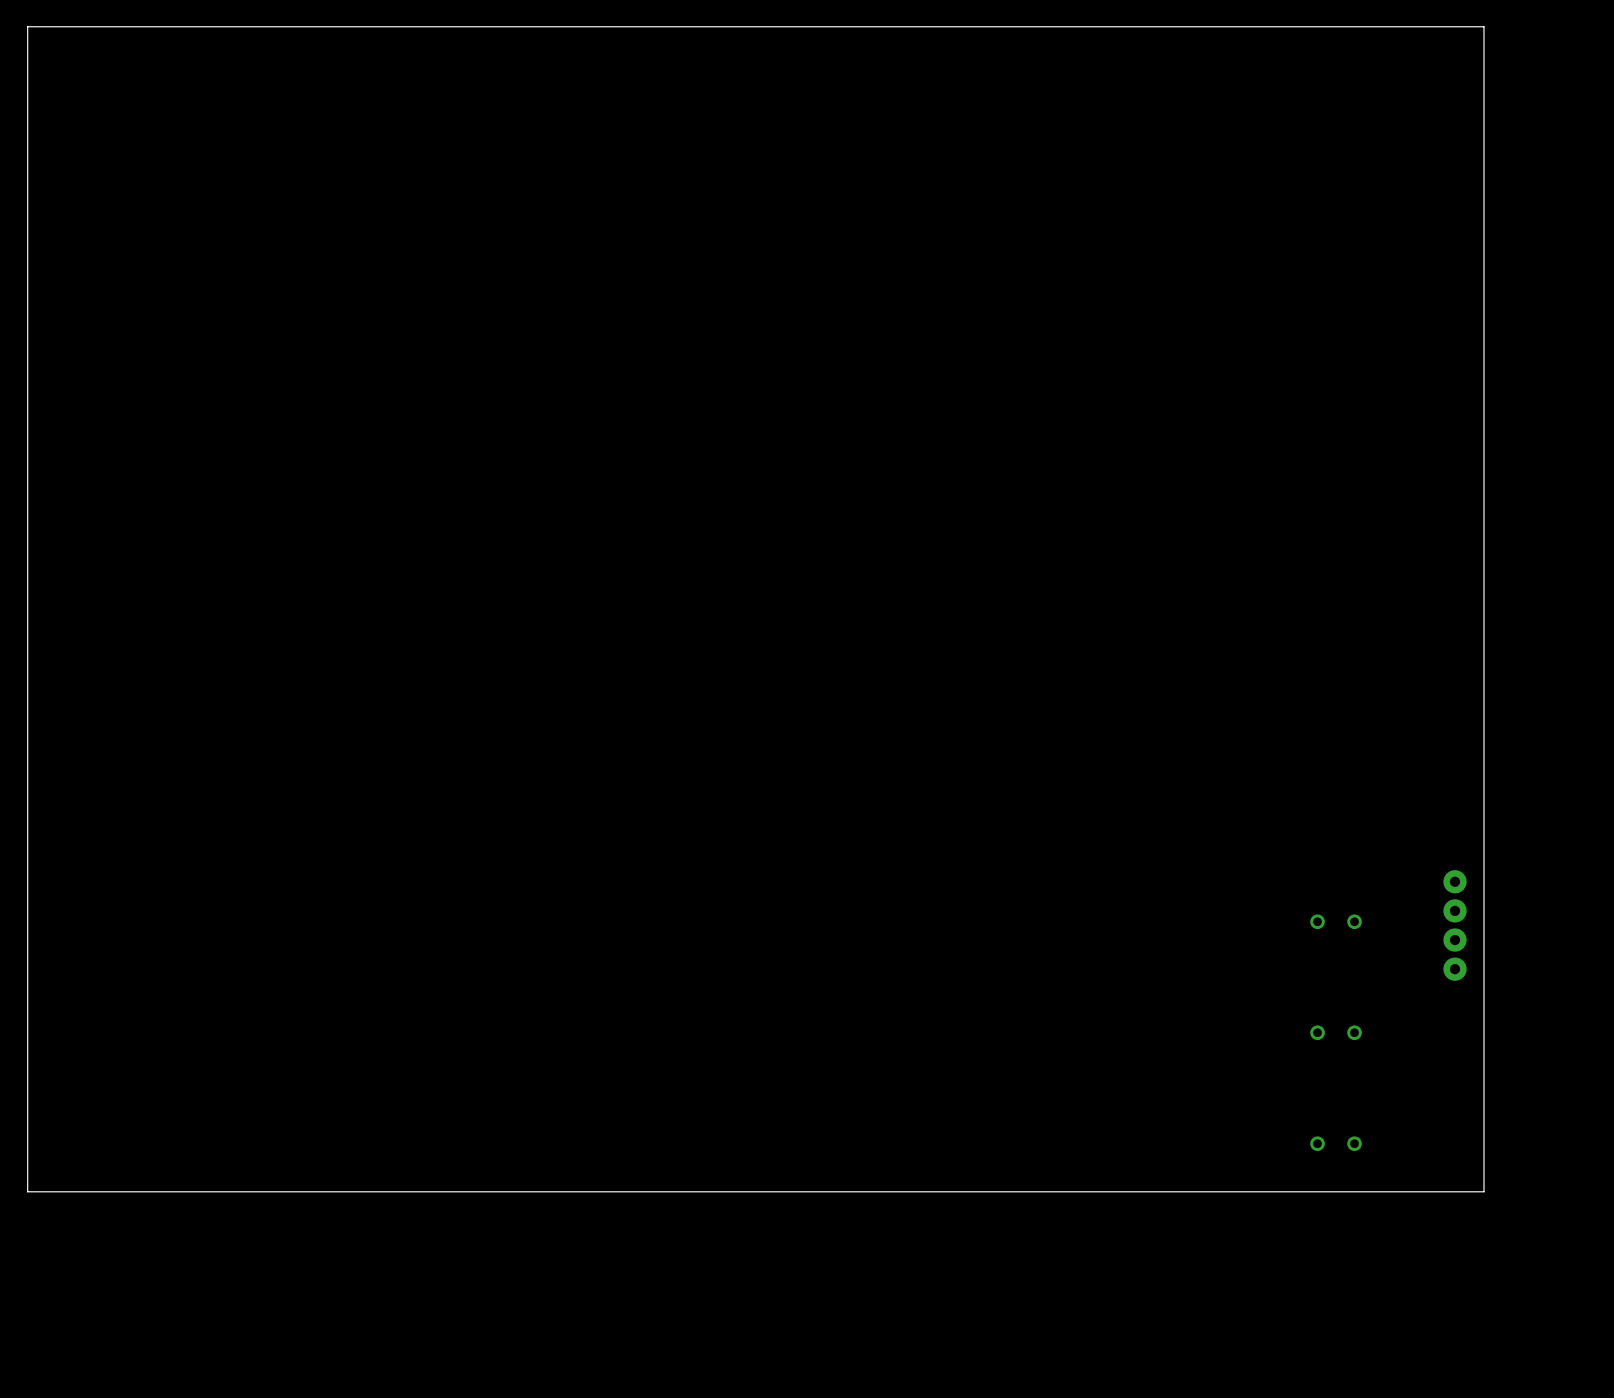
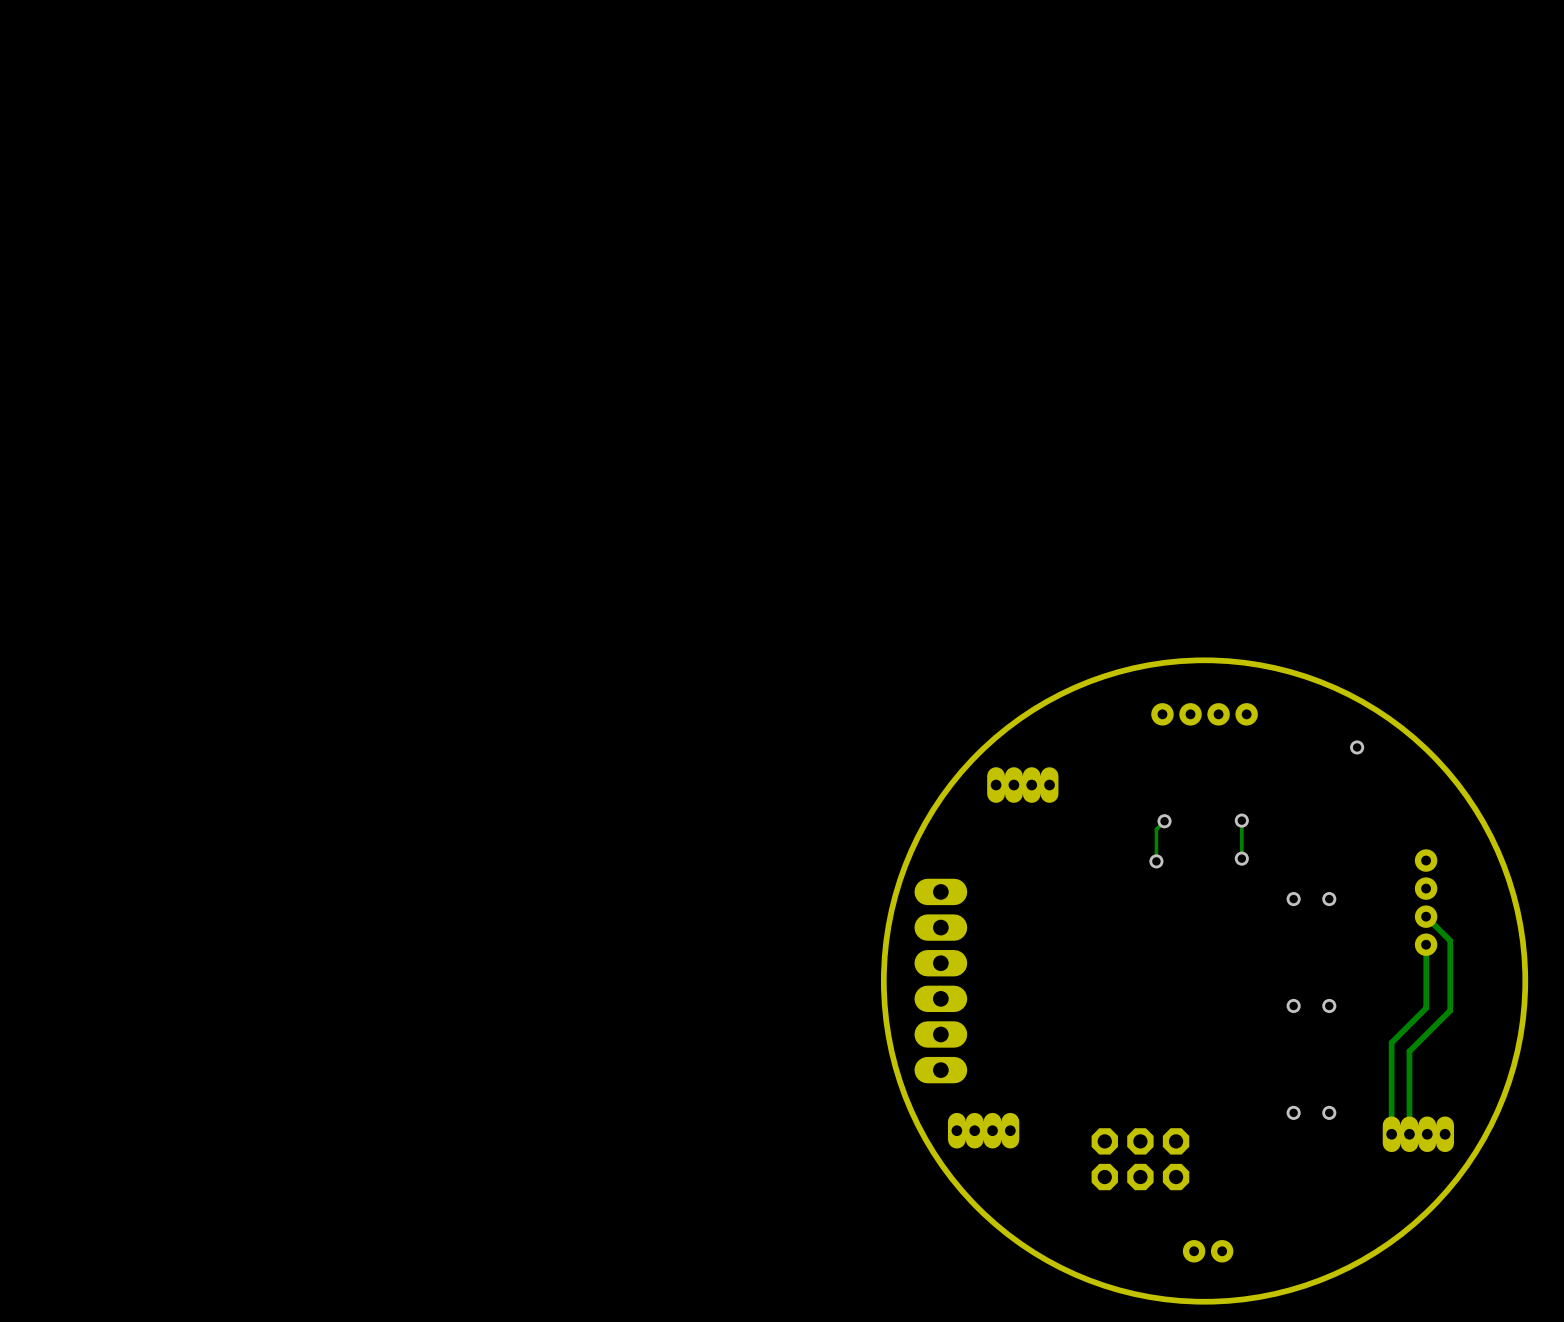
board edge: (1483, 26) (27, 26) (27, 1191) (1483, 1191) (1483, 26) -> none
round board edge: none -> [880, 657, 1529, 1305]
part: none -> (1204, 714)
via: none -> (1357, 747)
part: none -> (1022, 785)
track: none -> (1164, 821) (1156, 829) (1156, 861)
via: none -> (1164, 821)
track: none -> (1241, 820) (1241, 858)
via: none -> (1241, 820)
via: none -> (1241, 858)
via: none -> (1156, 861)
track: none -> (1426, 916) (1450, 940) (1450, 1010) (1409, 1051) (1409, 1134)
track: none -> (1426, 944) (1426, 1008) (1391, 1042) (1391, 1134)
part: none -> (940, 981)
part: none -> (983, 1130)
part: none -> (1418, 1134)
part: none -> (1140, 1159)
part: none -> (1208, 1251)

